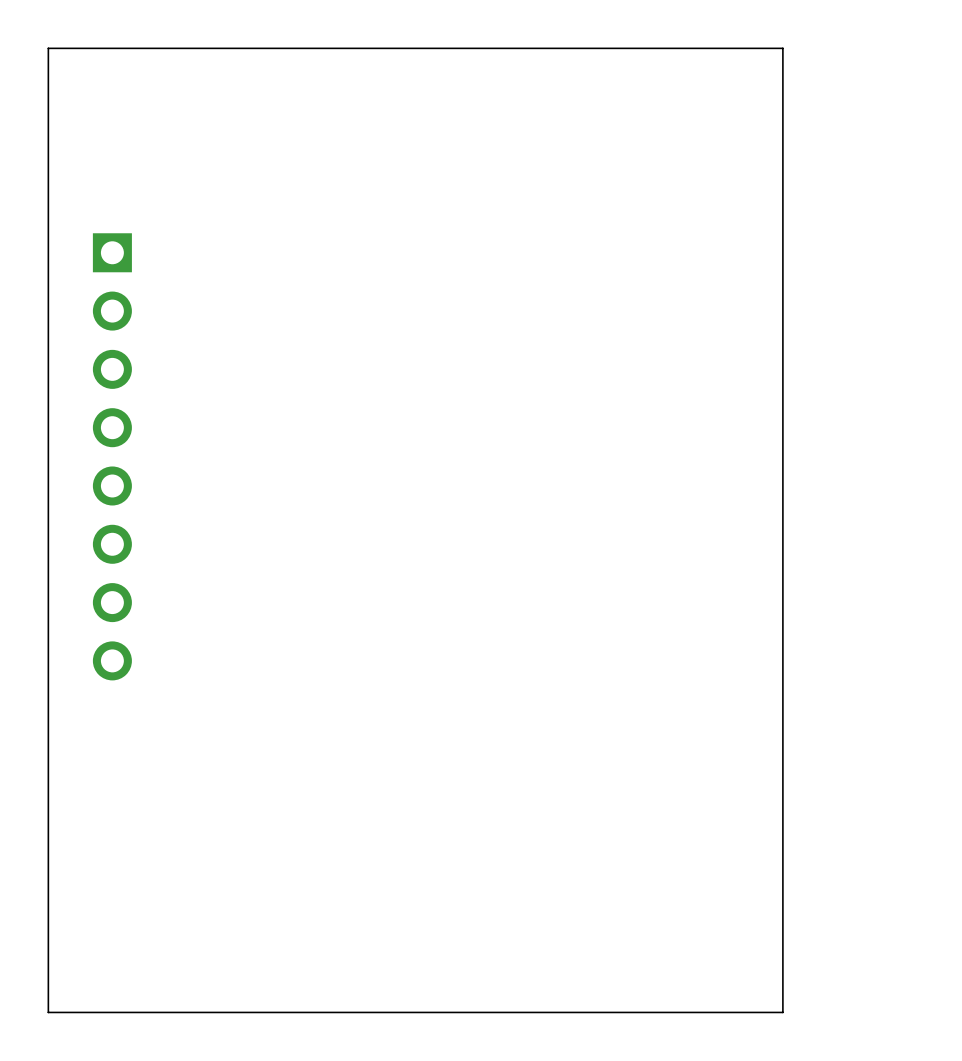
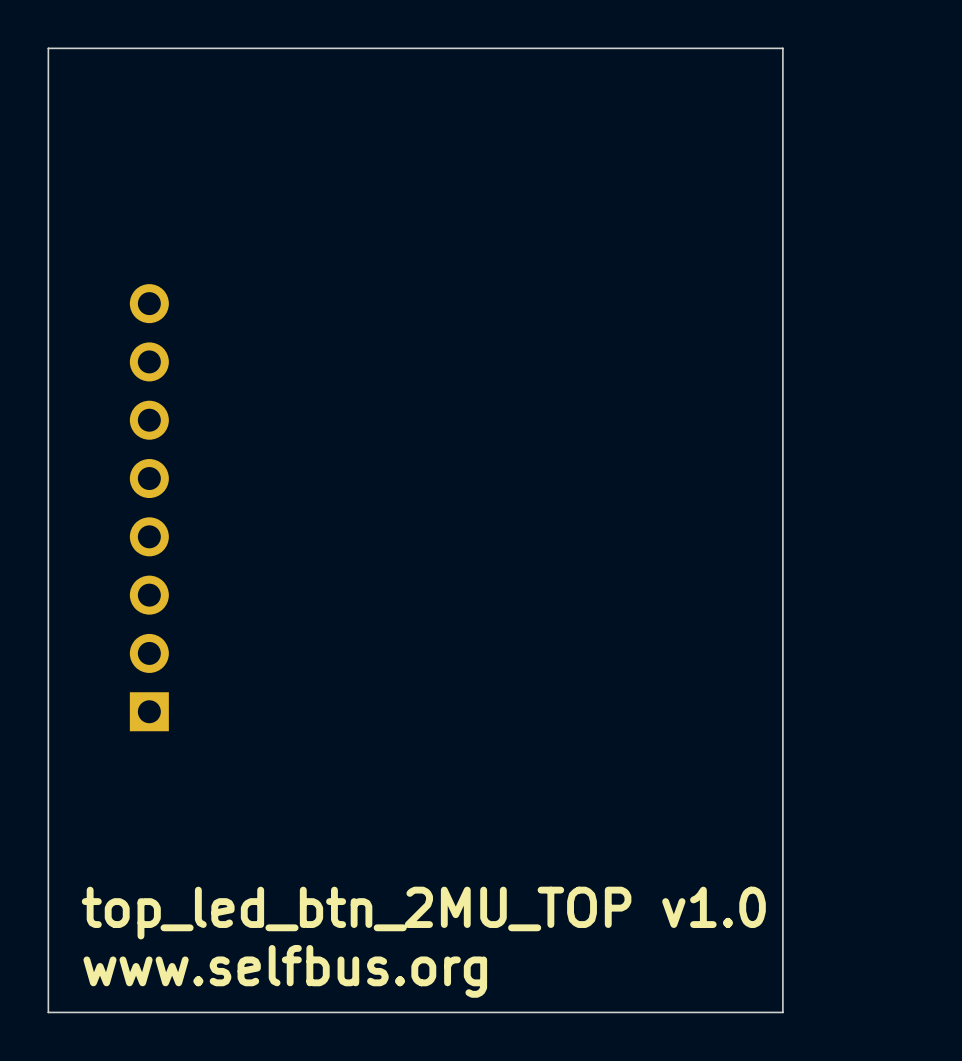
part rotation: 0° (112, 456) -> 180° (149, 507)
text: none -> top_led_btn_2MU_TOP v1.0 (423, 913)
text: none -> www.selfbus.org (285, 971)

